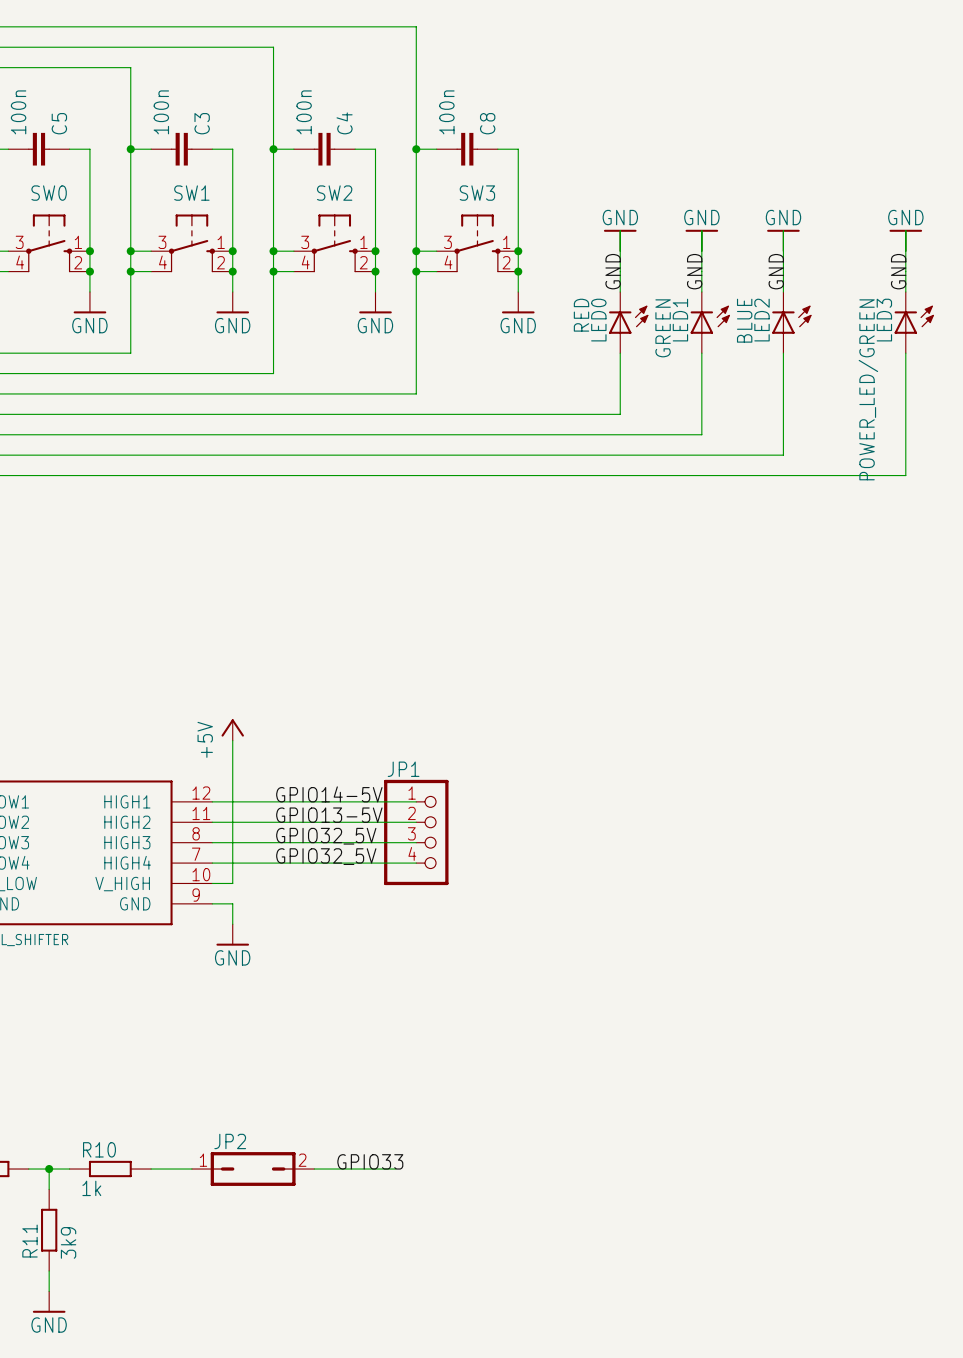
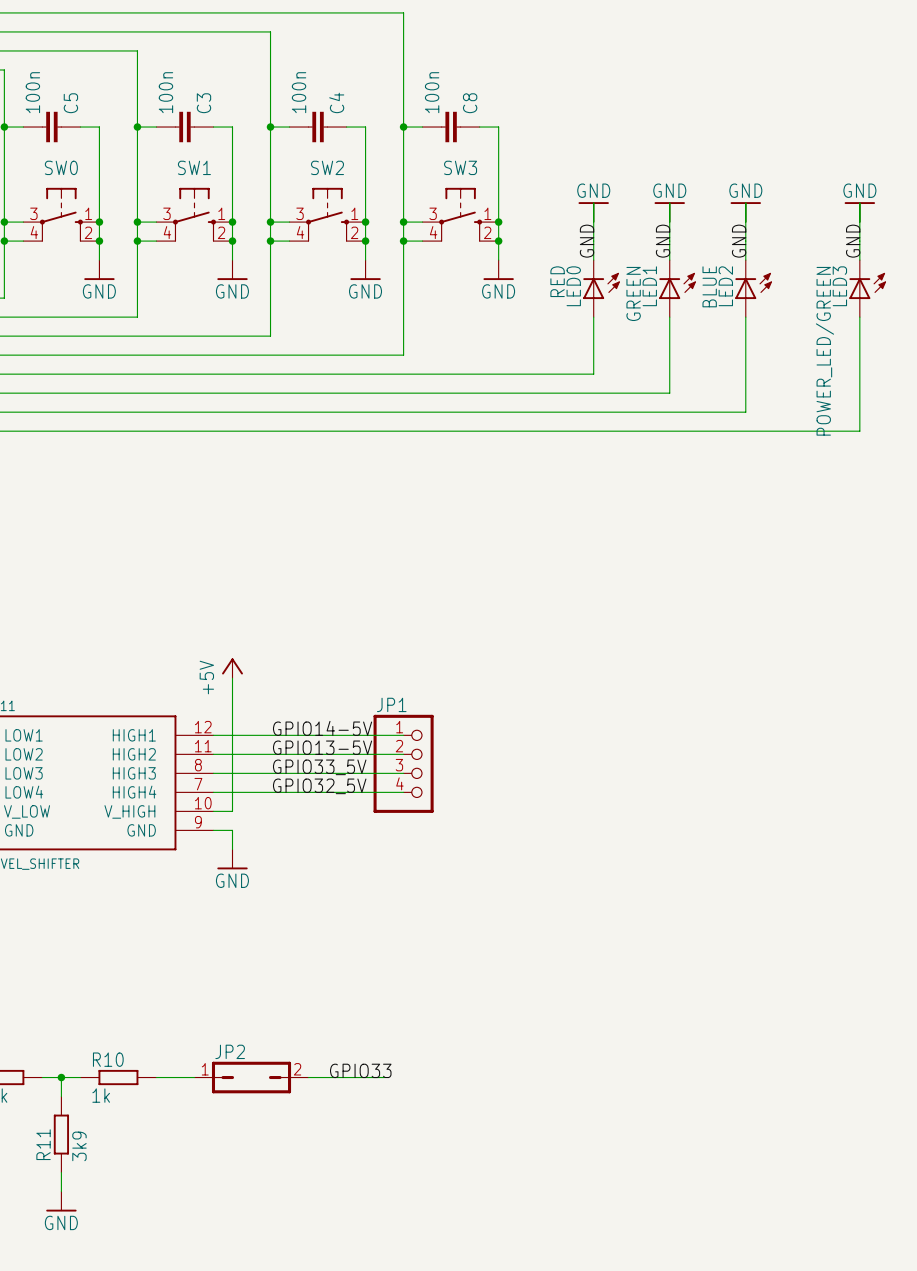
label: GPIO32_5V (326, 836) -> GPIO33_5V (319, 767)

